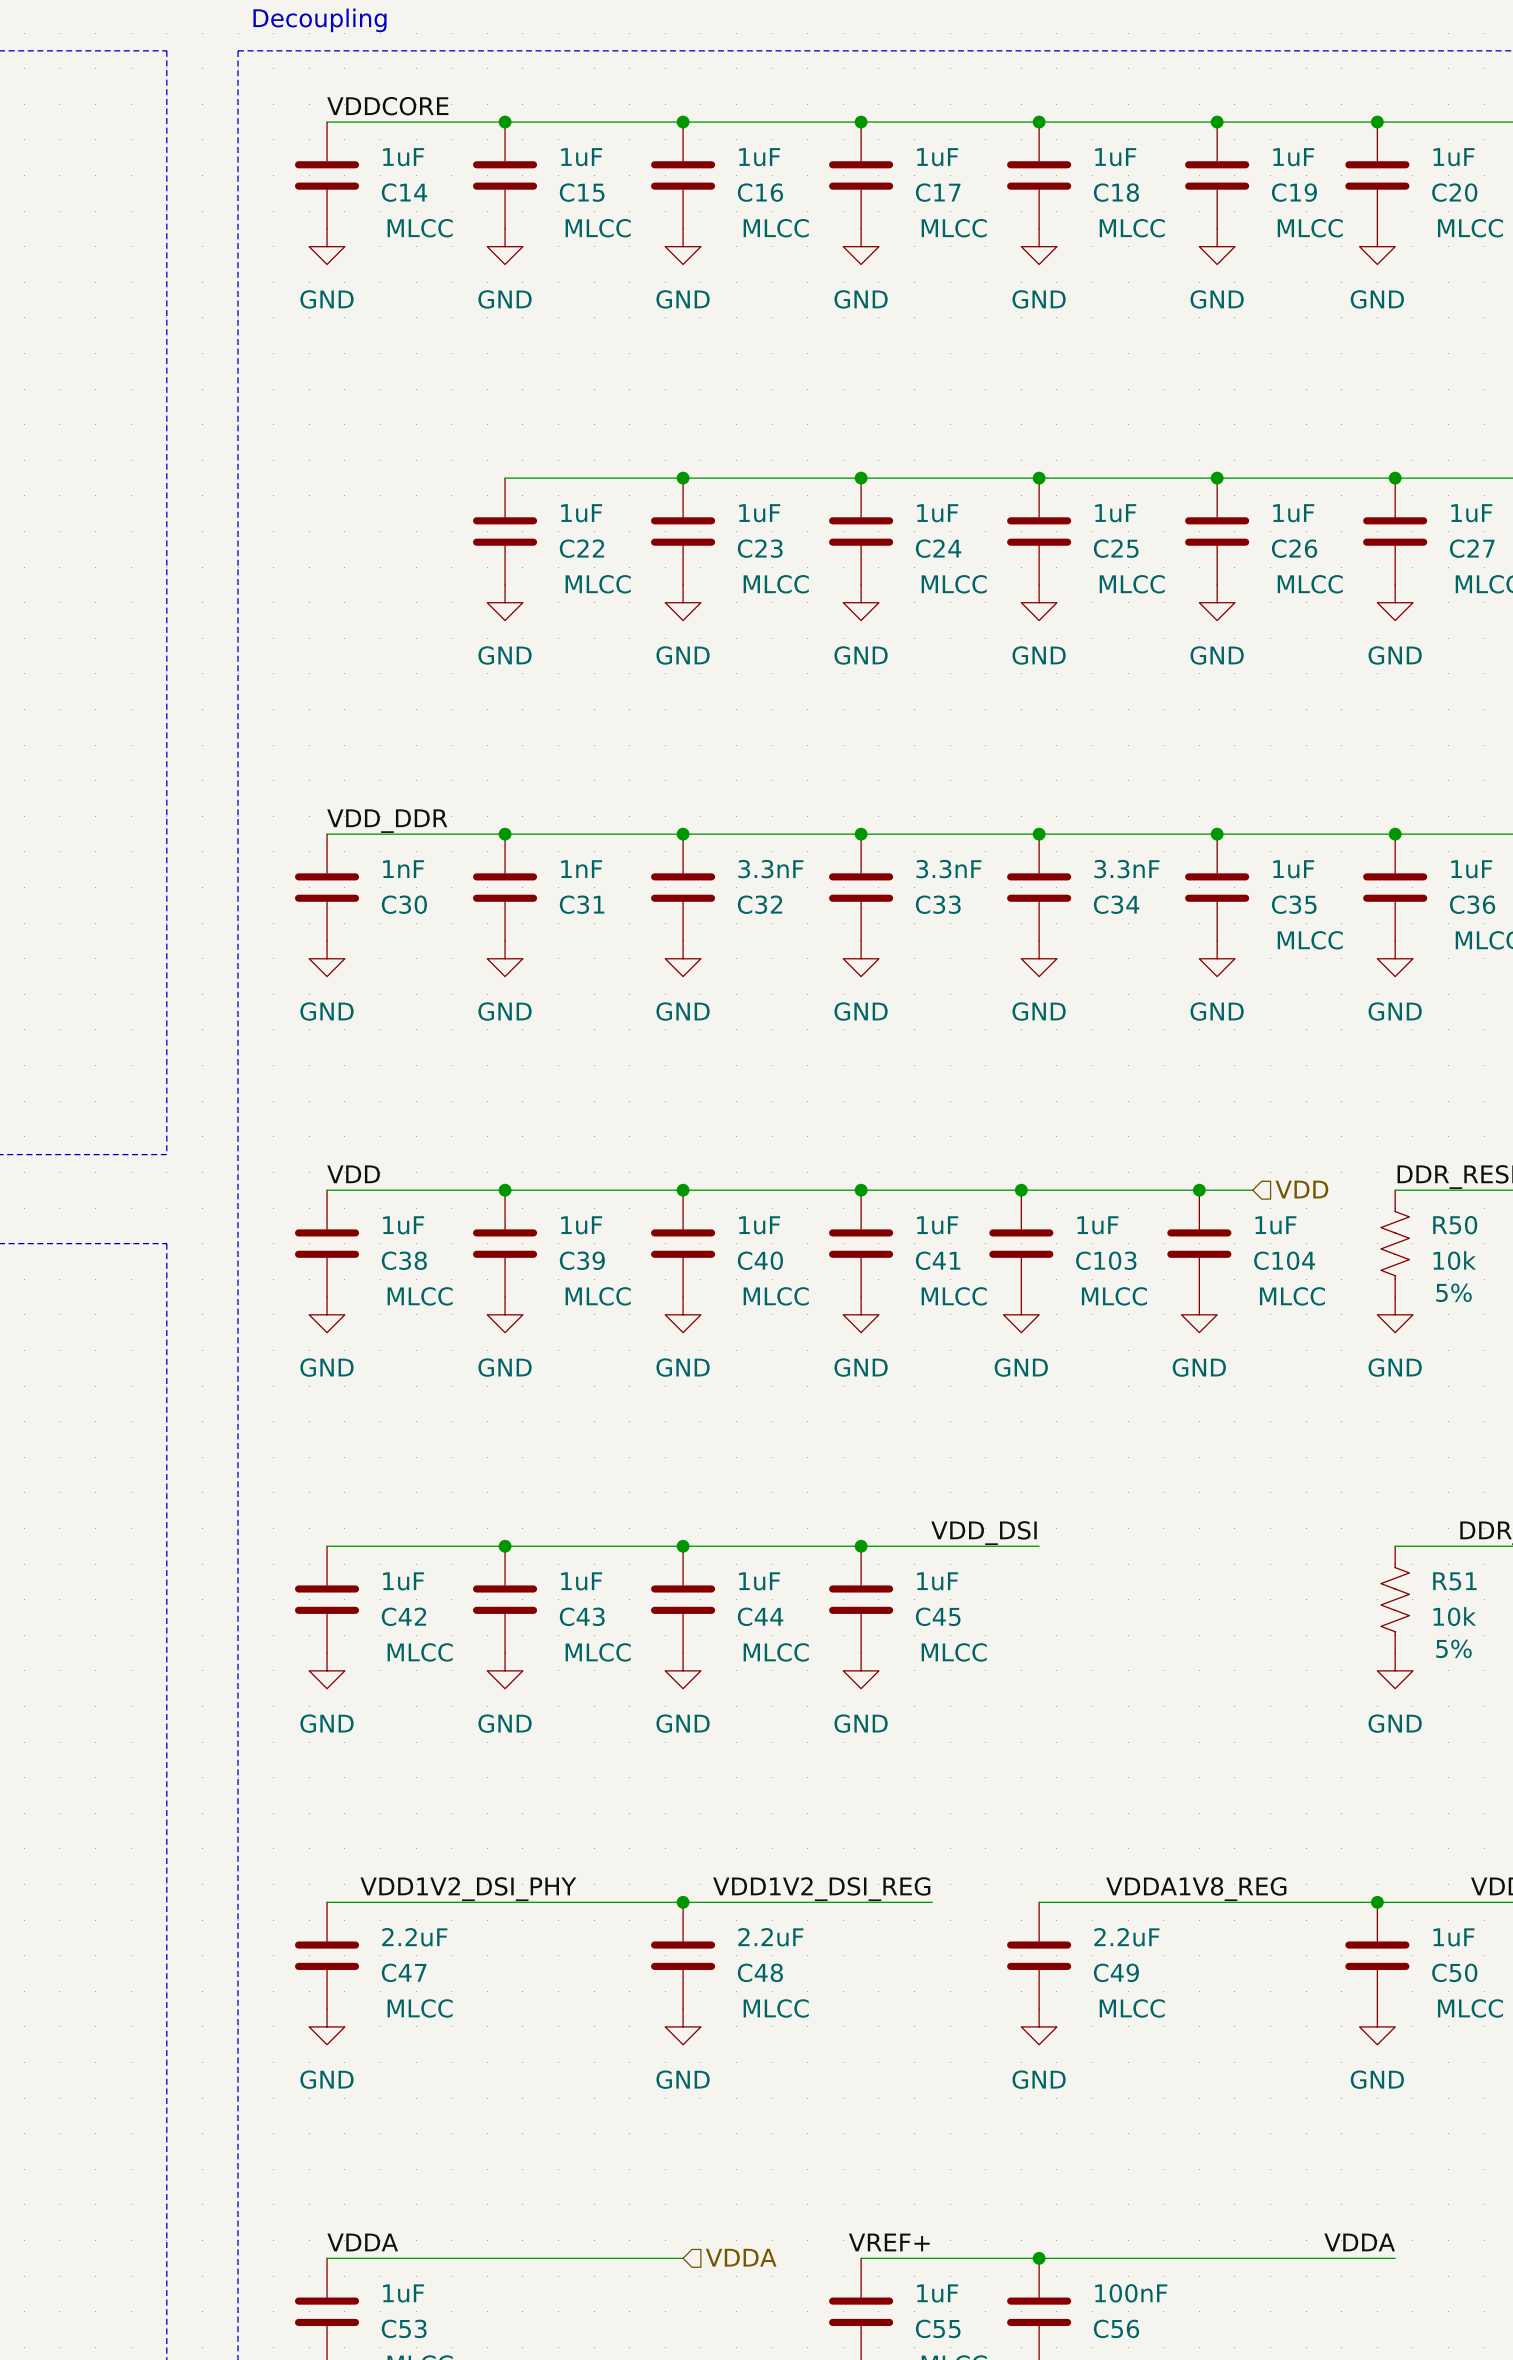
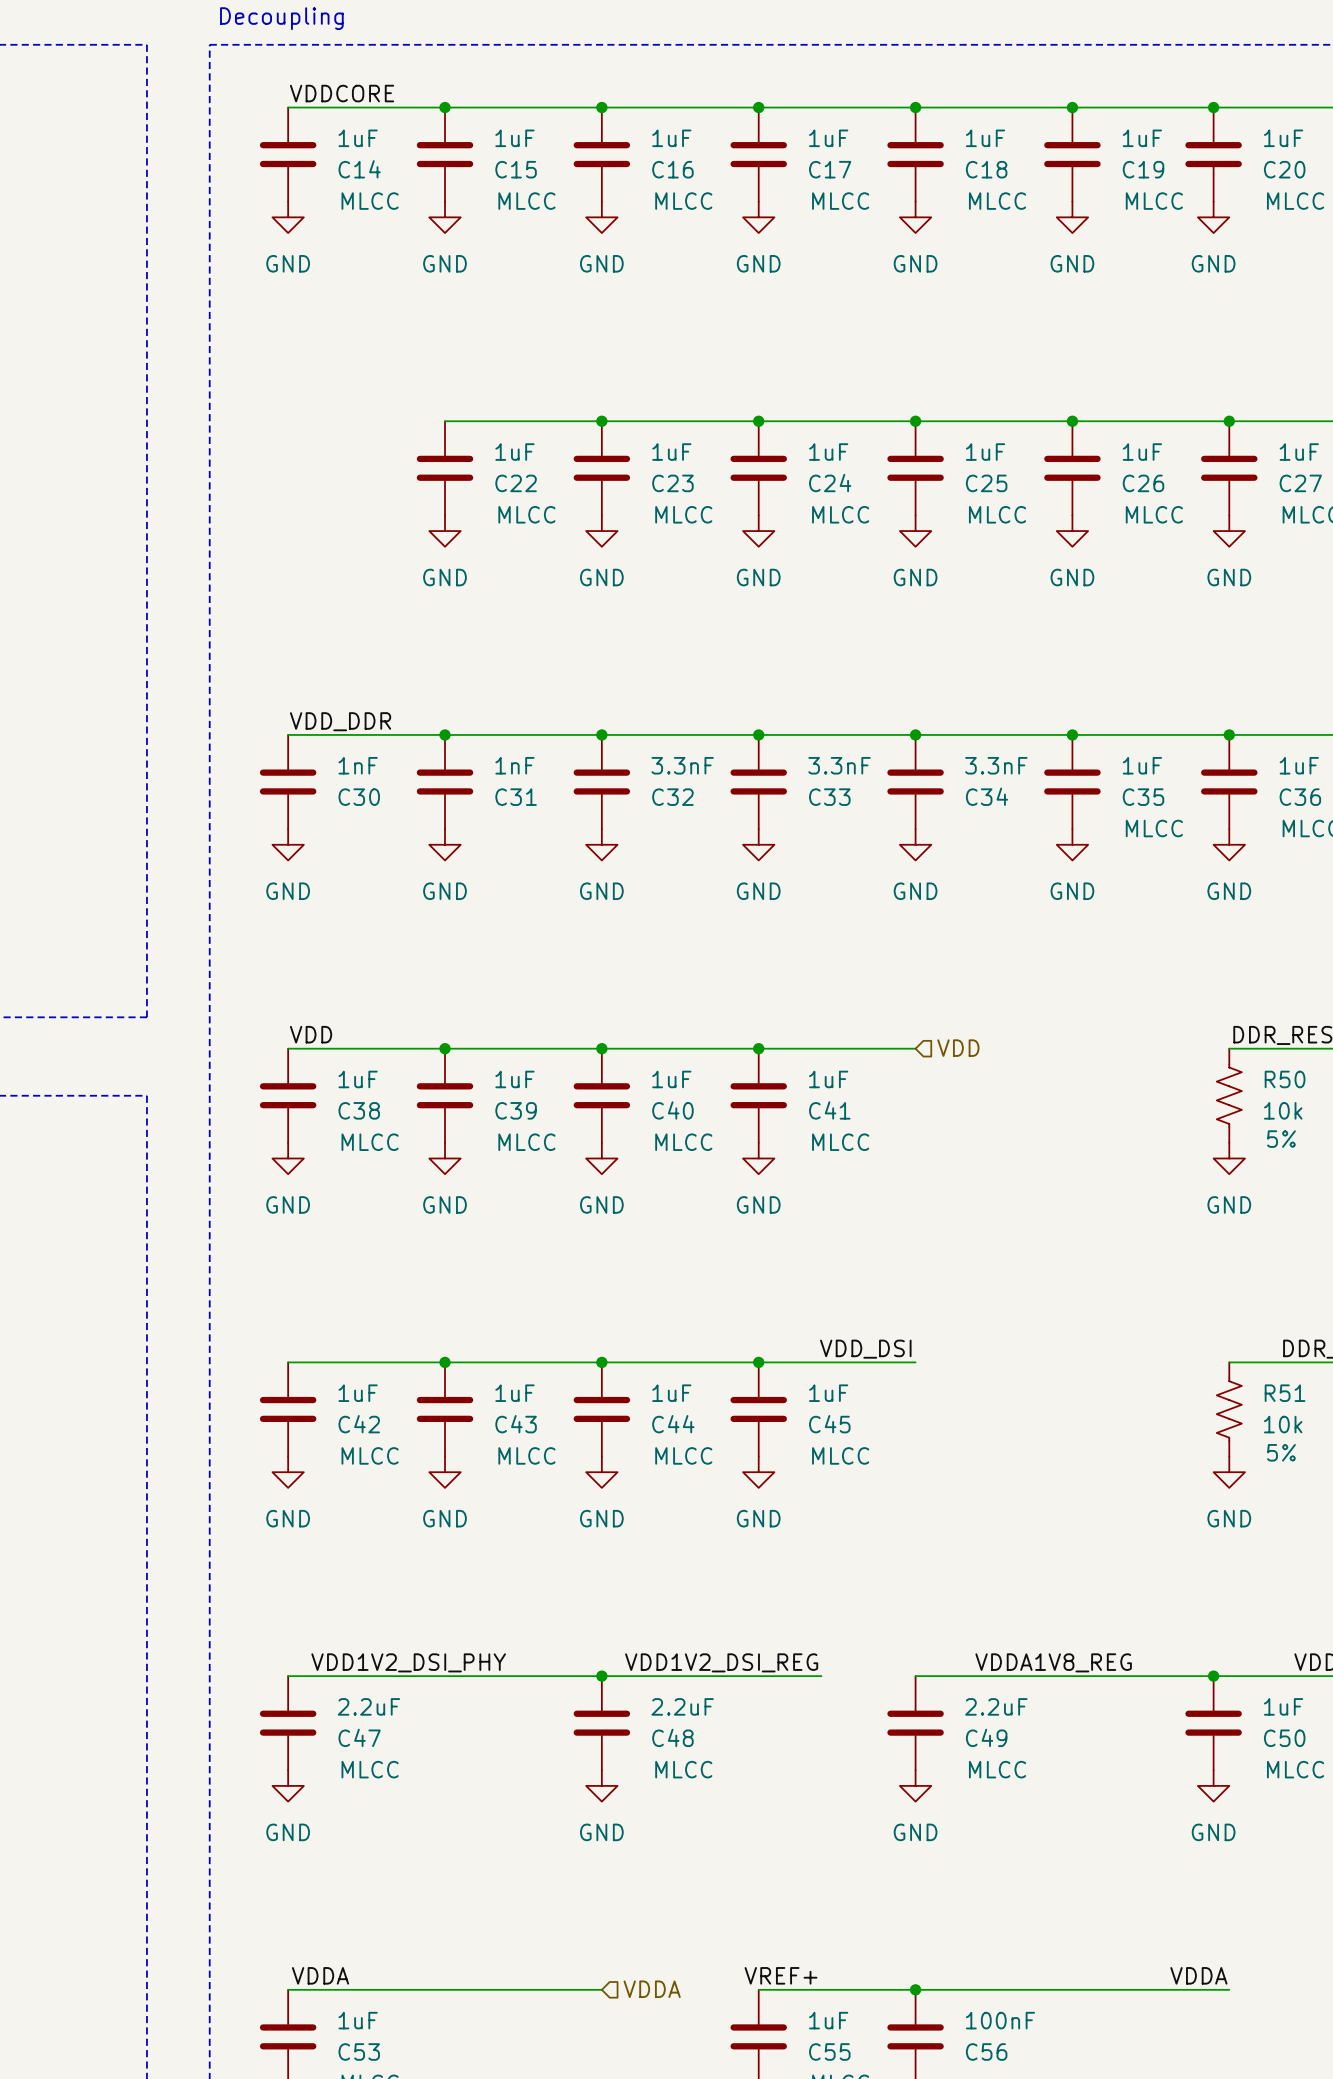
hierarchical label position: VDD (1301, 1189) -> VDD (958, 1048)
junction: (1021, 1190) -> none
wire: (1039, 1190) (1252, 1190) -> none
junction: (1199, 1190) -> none
C103: 1uF (1021, 1243) -> none
C104: 1uF (1199, 1243) -> none
power symbol: GND (1021, 1314) -> none
power symbol: GND (1199, 1314) -> none

